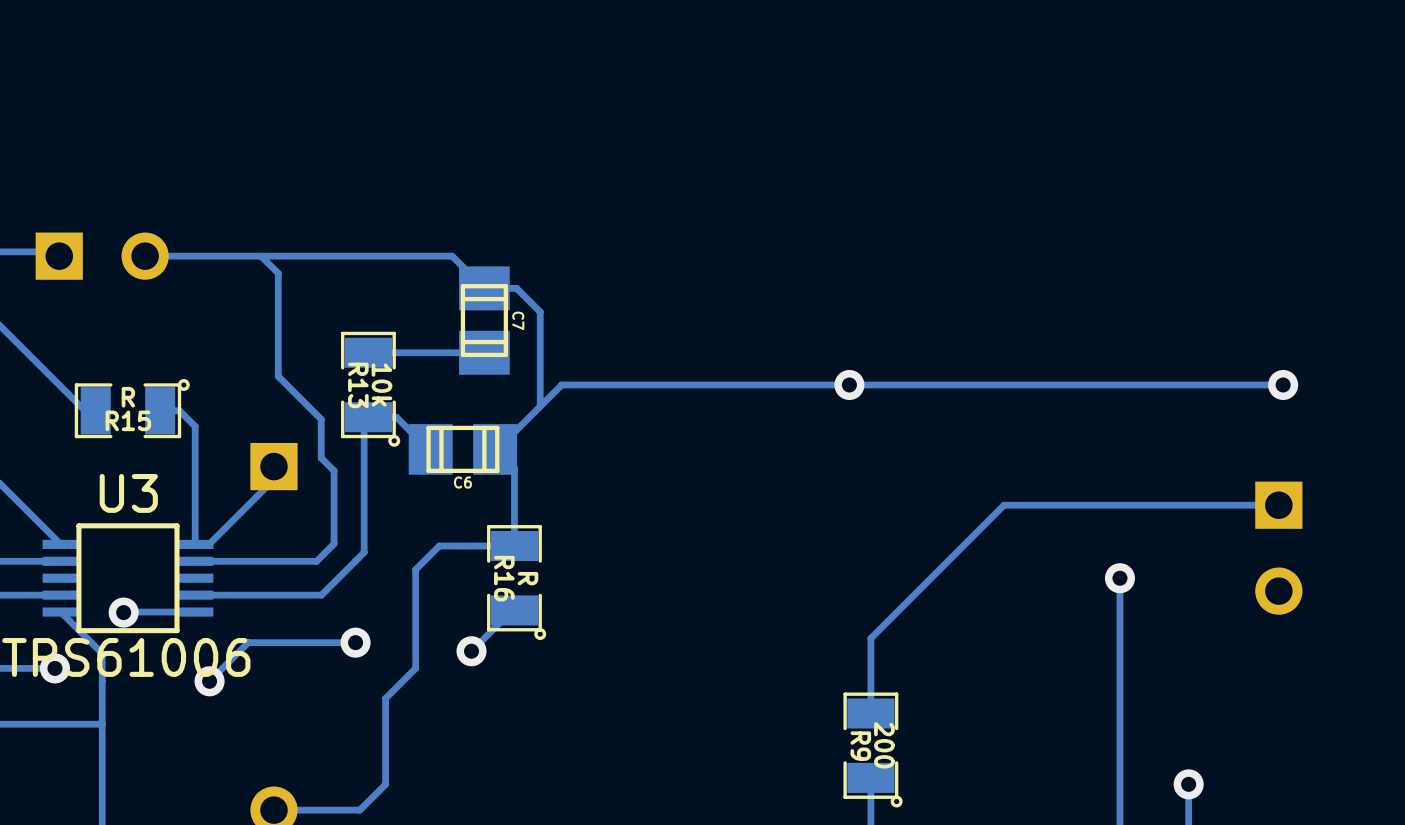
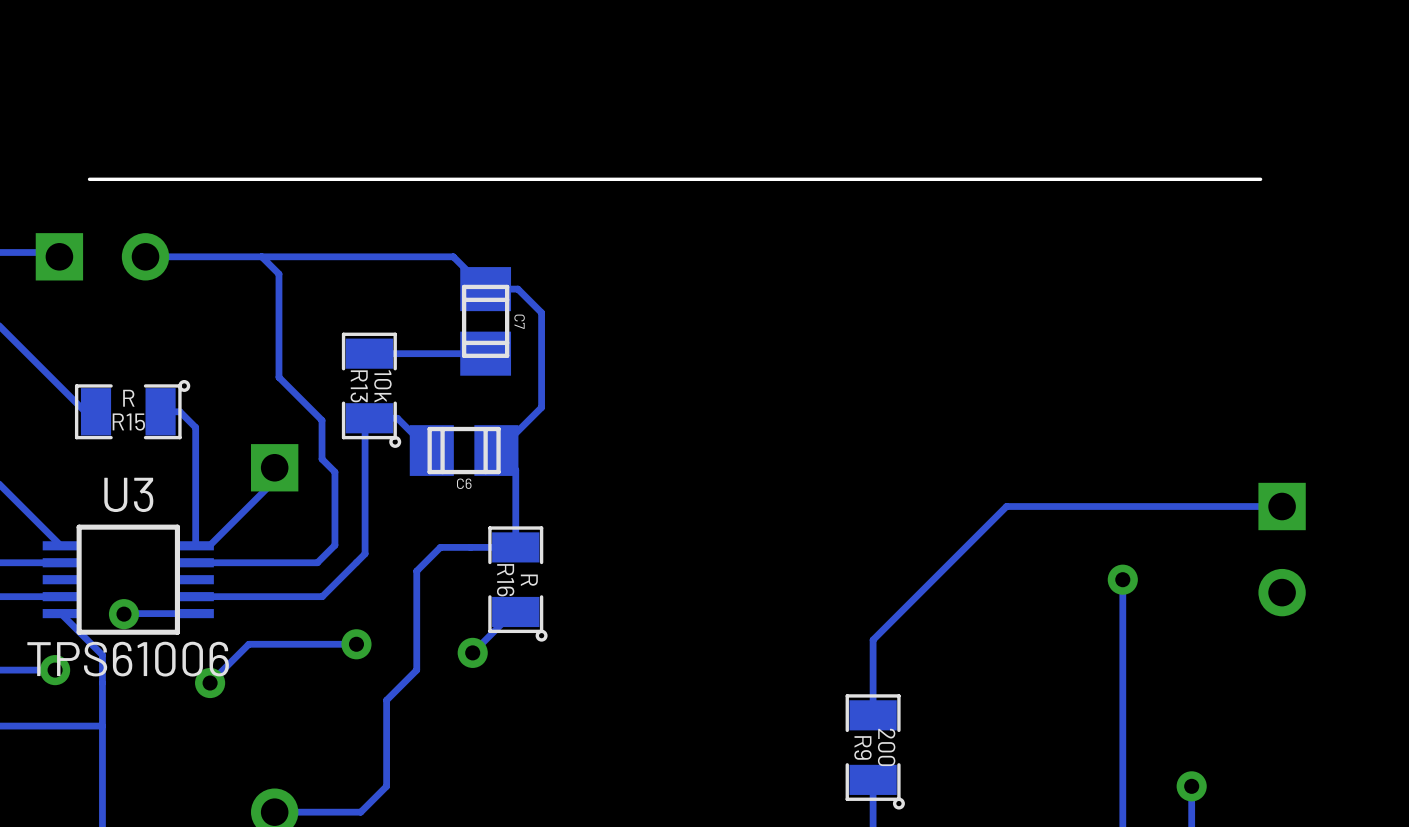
board edge: none -> (1260, 179) (89, 179)
via: (849, 384) -> none
track: (1283, 384) (561, 384) (540, 406) -> none
via: (1283, 384) -> none

